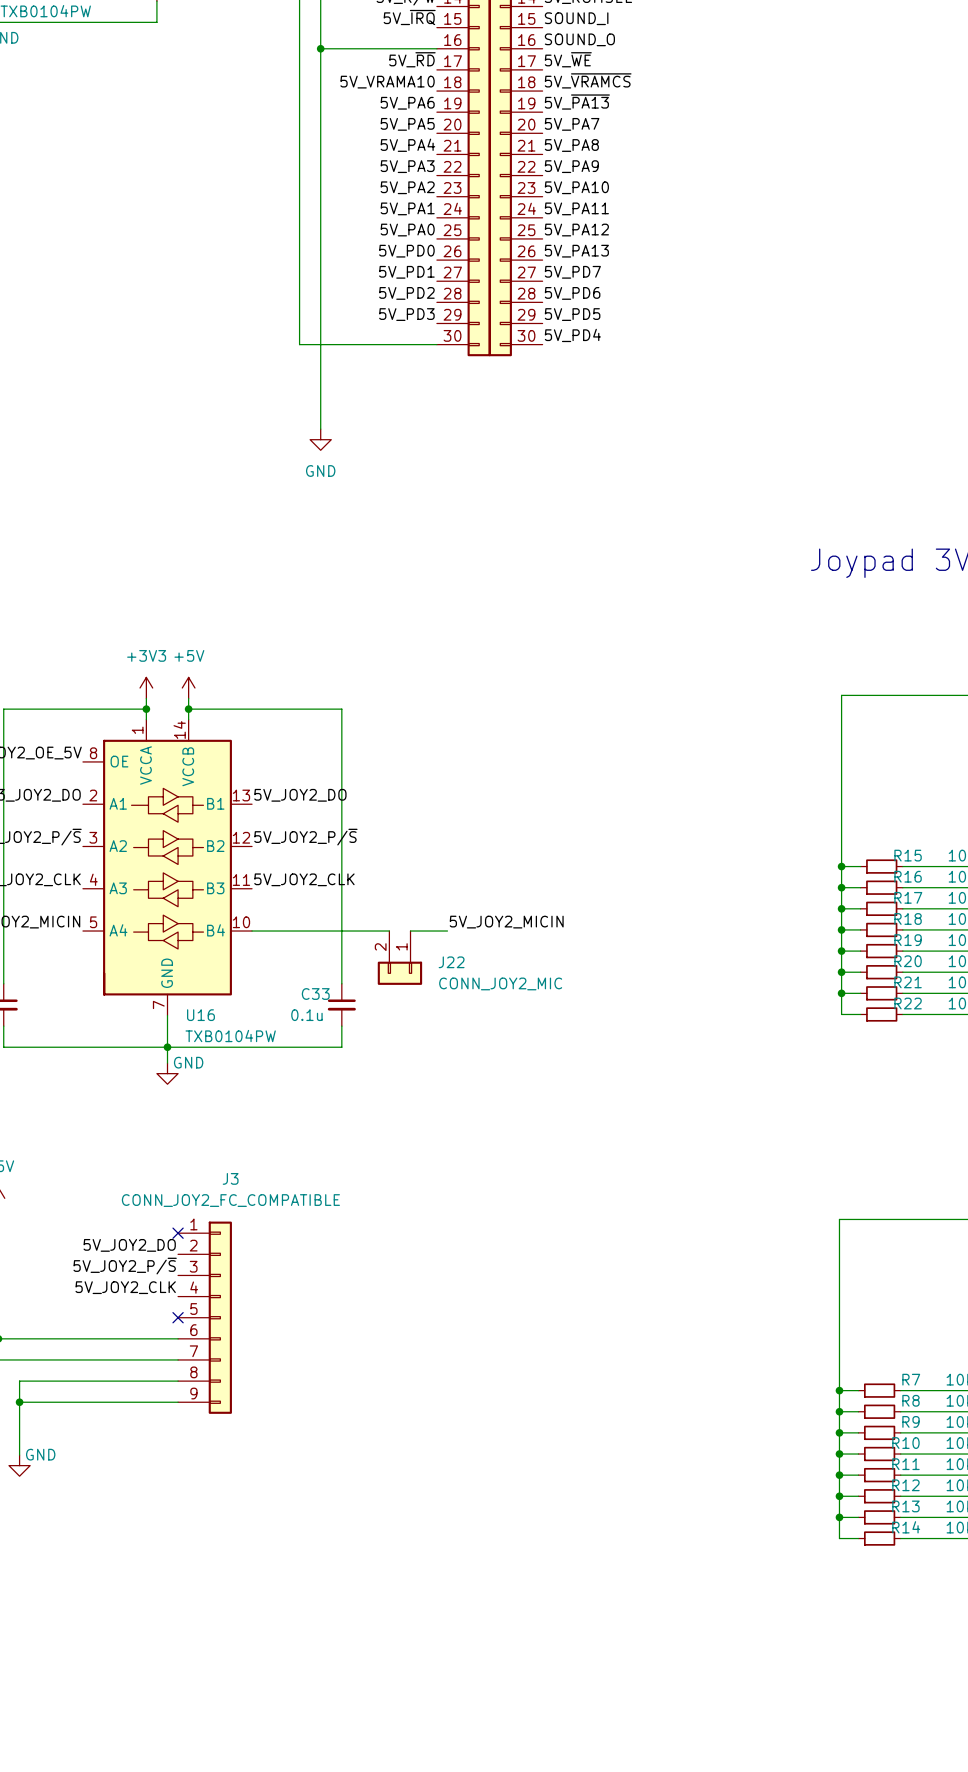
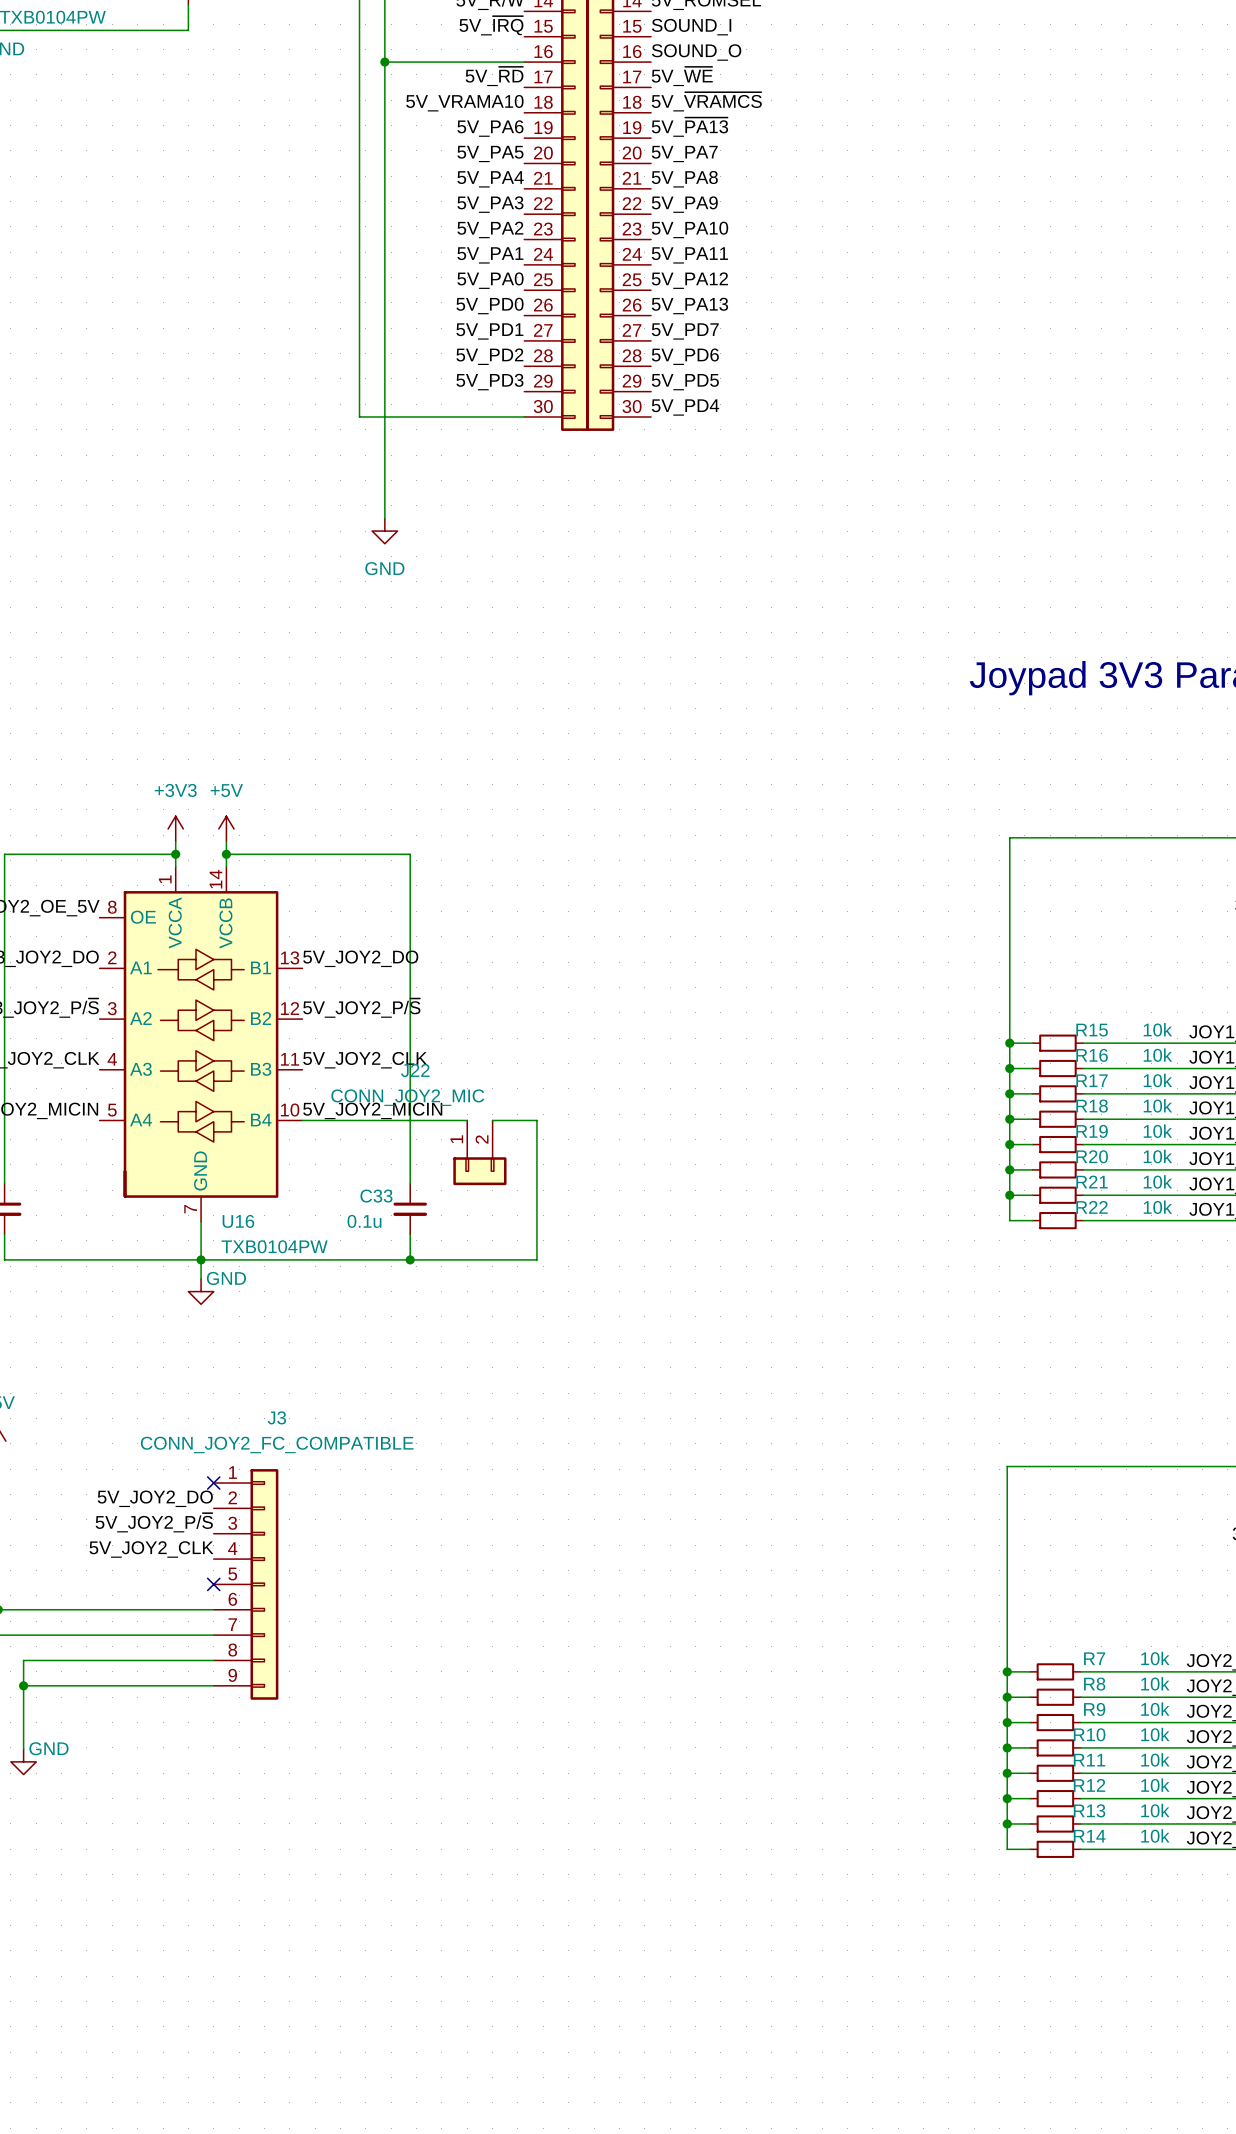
label position: 5V_JOY2_MICIN (506, 922) -> 5V_JOY2_MICIN (372, 1110)
wire: none -> (536, 1120) (536, 1259) (410, 1259)
J22 name position: J22 (451, 962) -> J22 (415, 1070)
J22 flip: as is (399, 973) -> left-right (479, 1171)
J22 value position: CONN_JOY2_MIC (500, 983) -> CONN_JOY2_MIC (407, 1097)
junction: none -> (410, 1259)

